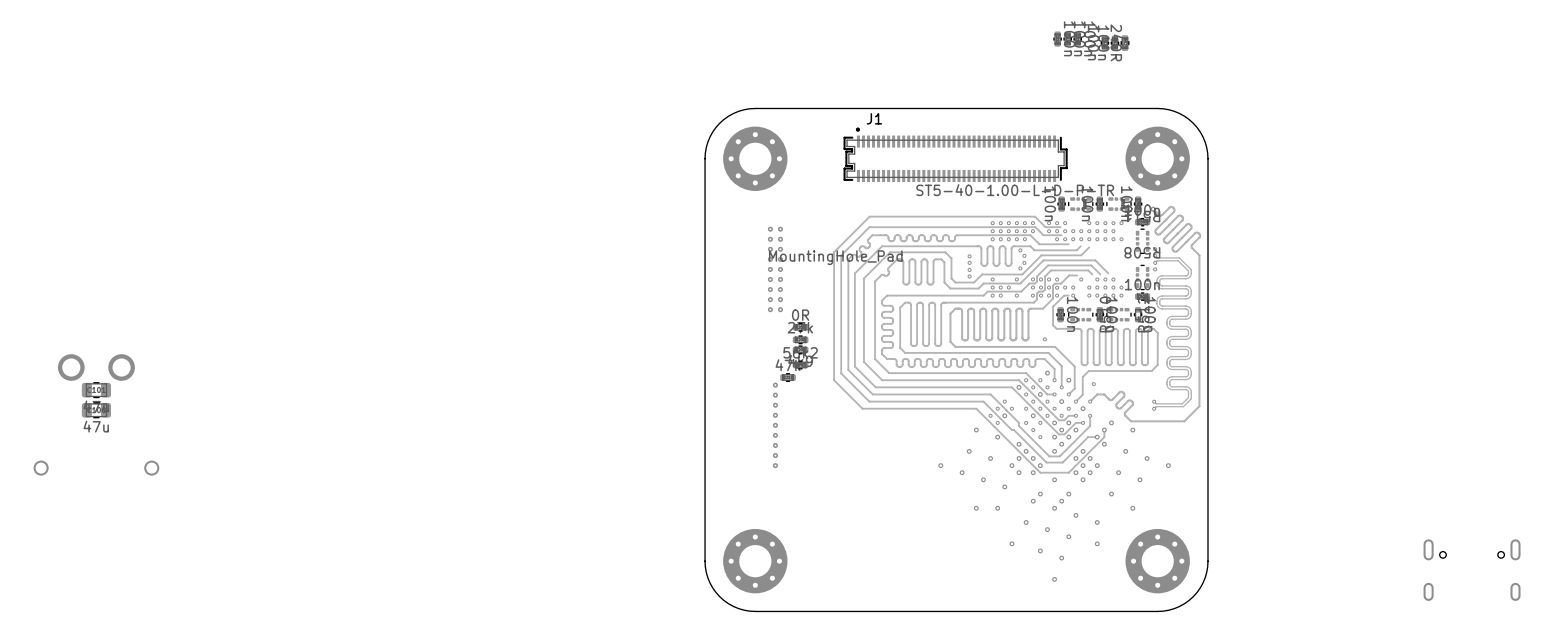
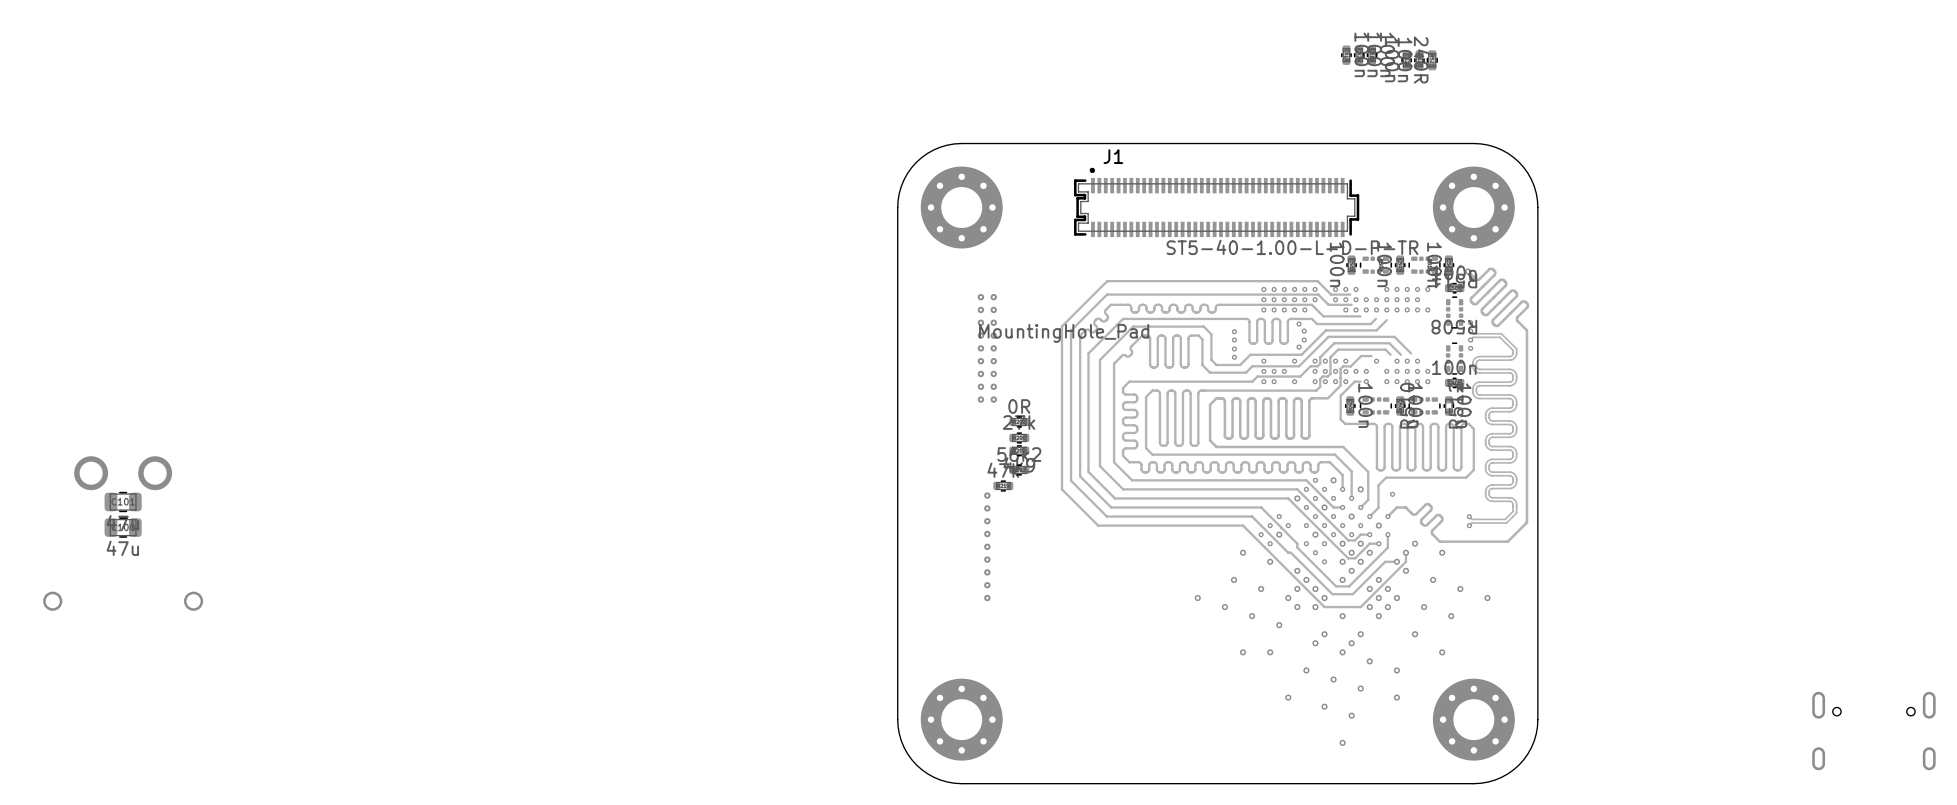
via position: (1044, 339) -> (1315, 480)

